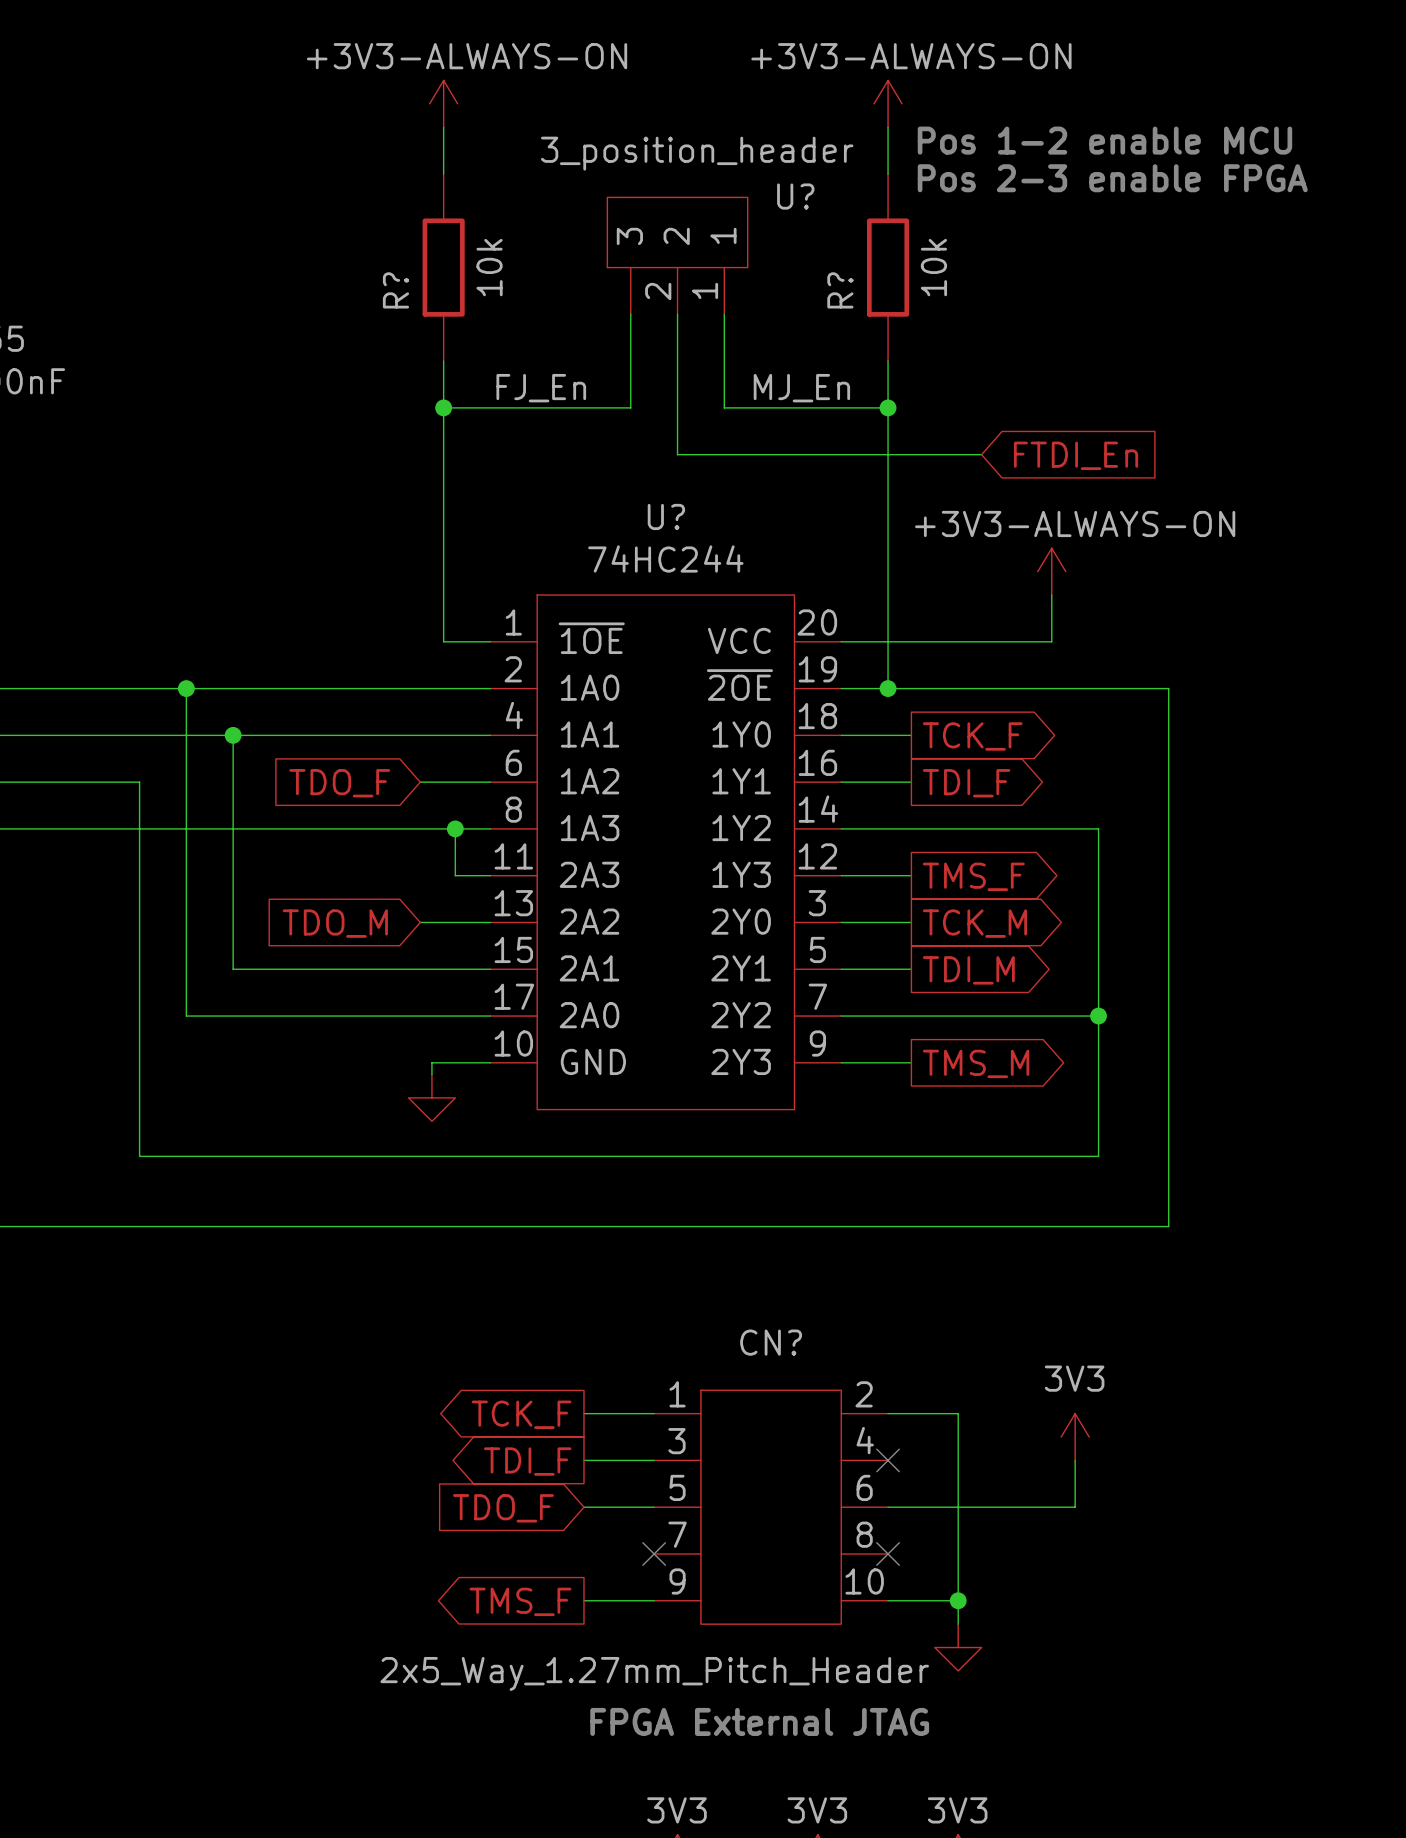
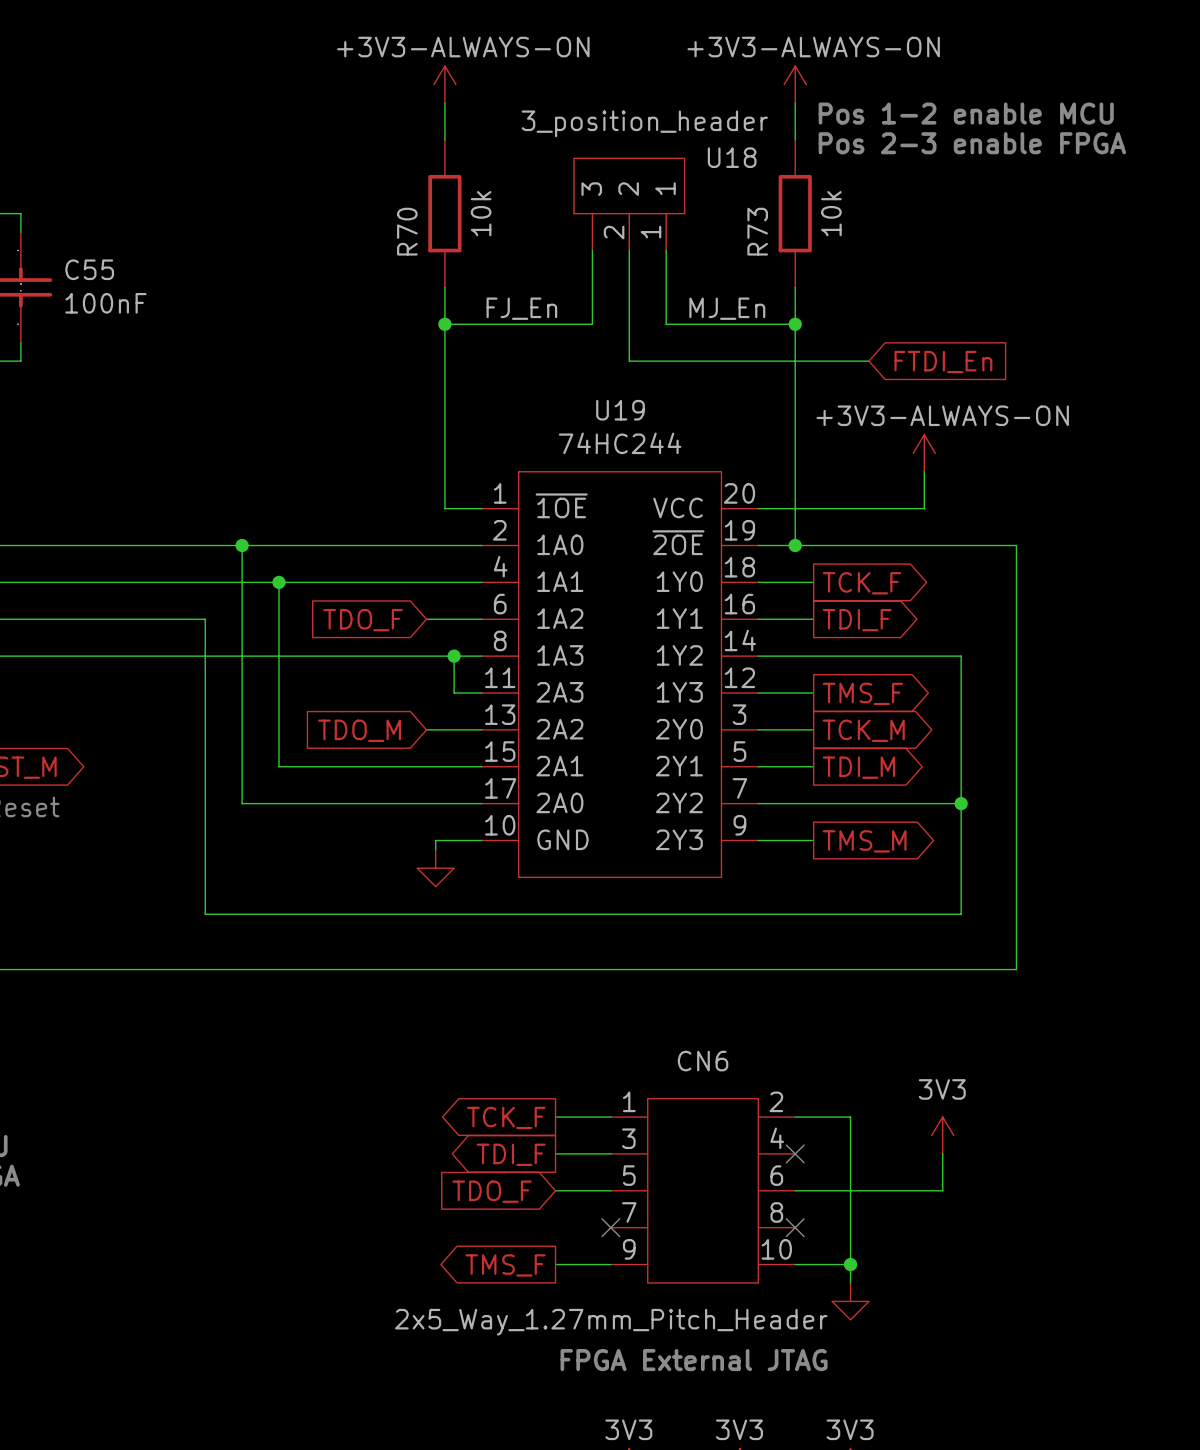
U? name: U? (795, 196) -> U18 (732, 157)
R? name: R? (395, 290) -> R70 (407, 231)
R? name: R? (840, 290) -> R73 (757, 231)
U? name: U? (666, 516) -> U19 (620, 410)
CN? name: CN? (771, 1342) -> CN6 (703, 1061)

